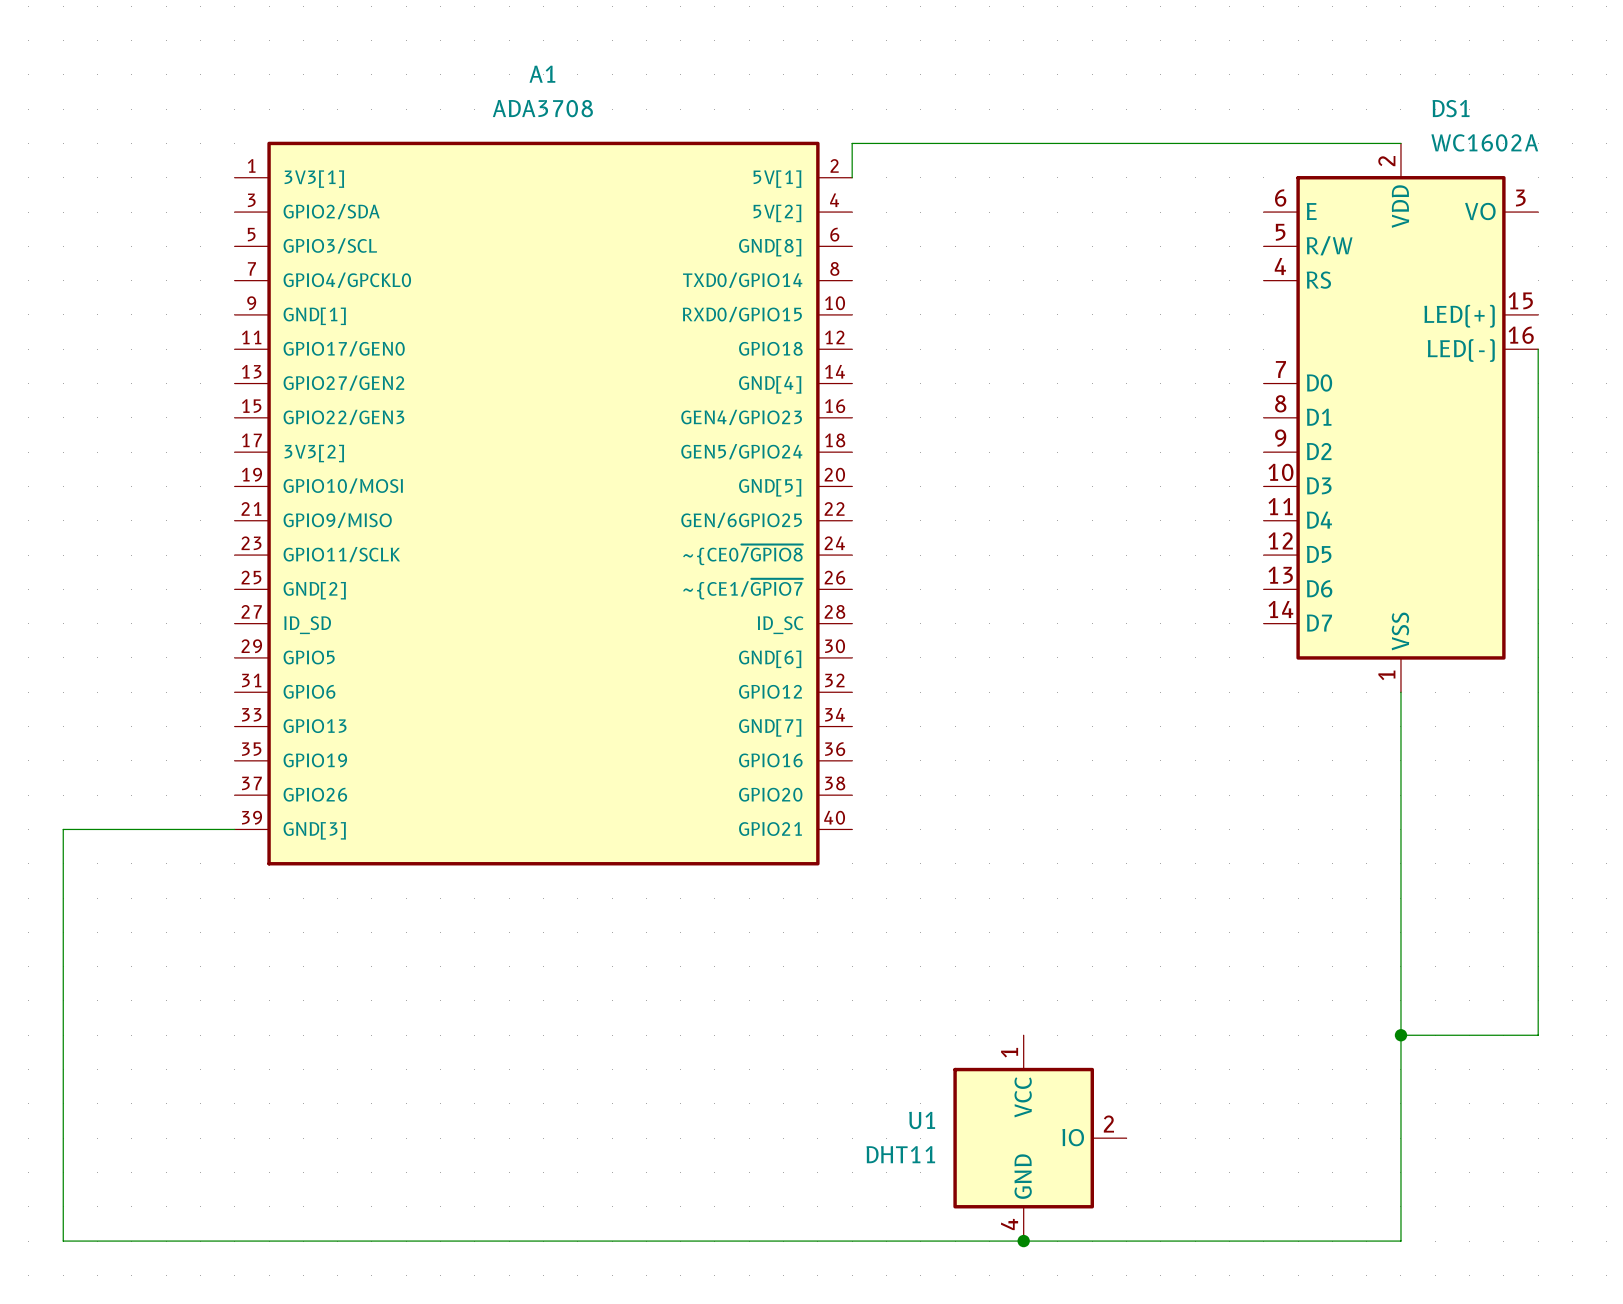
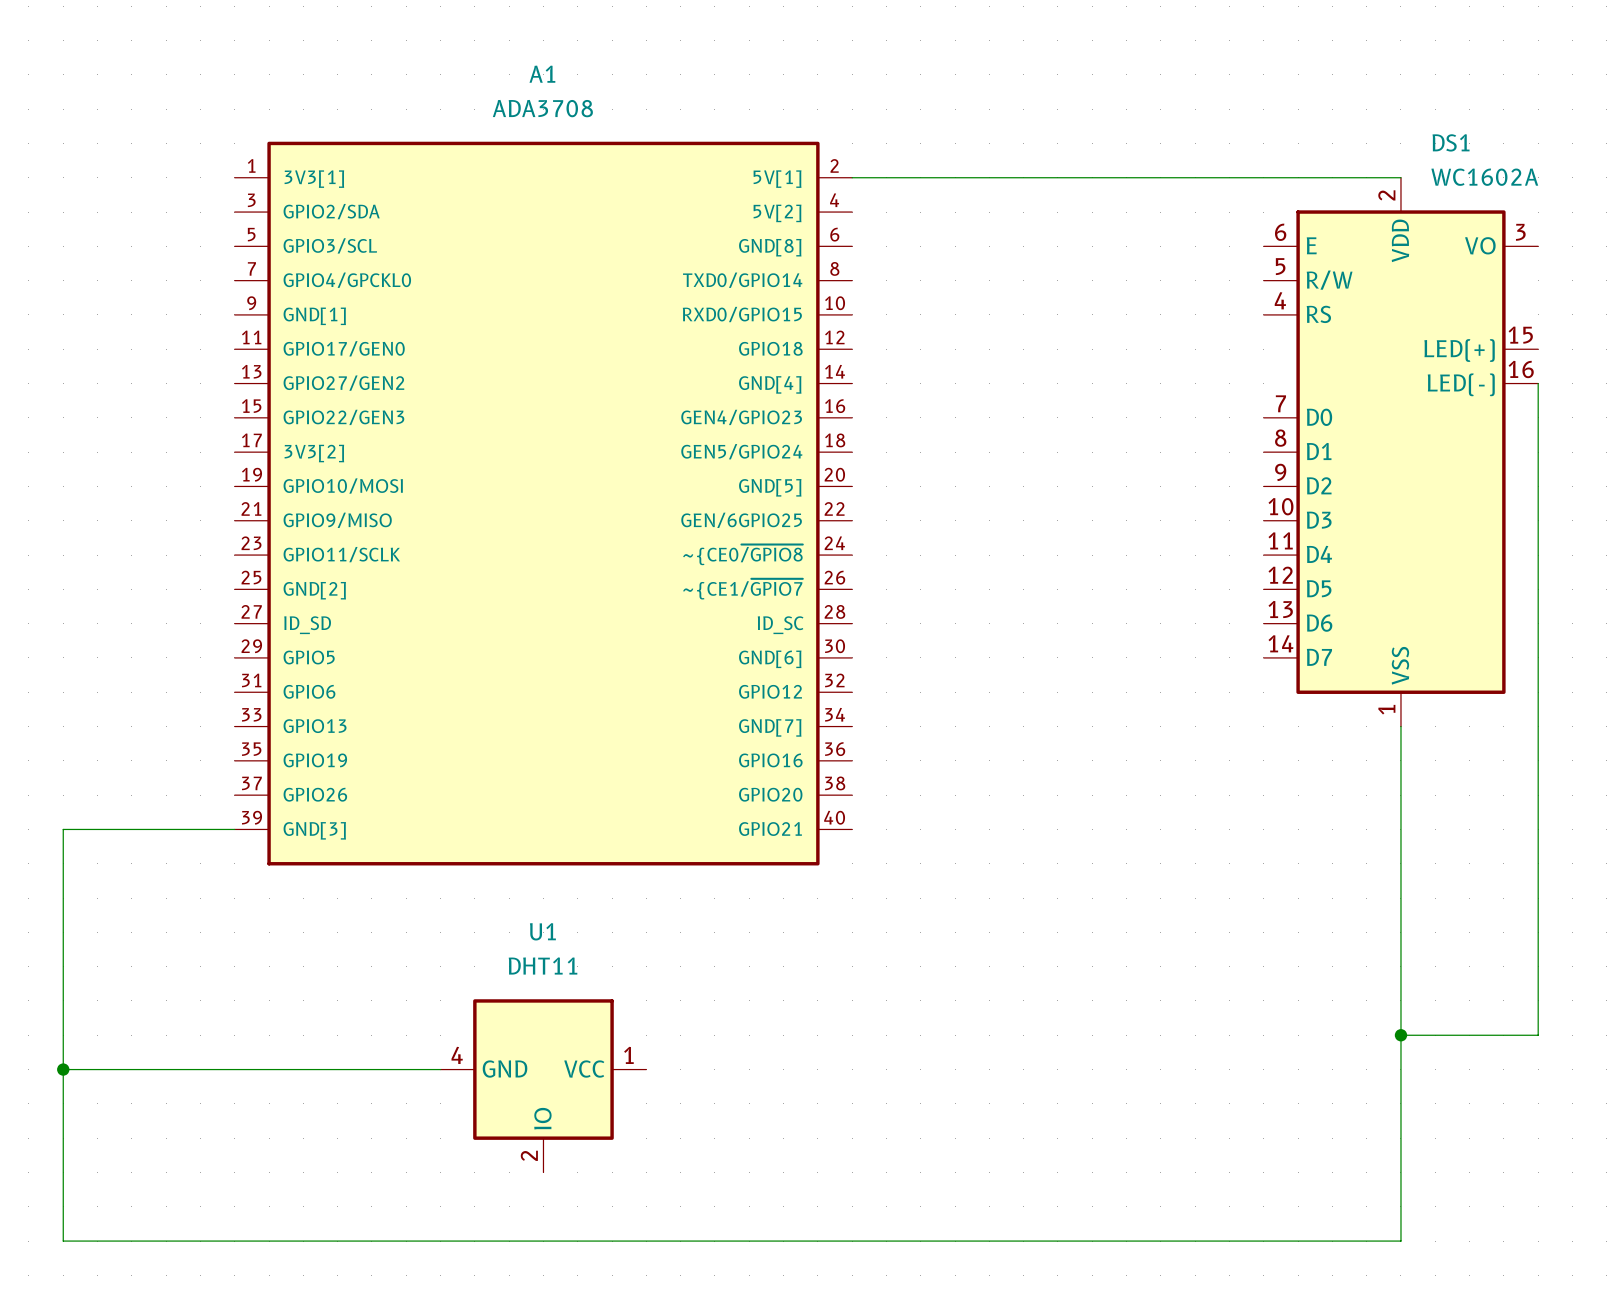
wire: (1400, 143) (852, 143) (852, 177) -> (1400, 177) (852, 177)
wire: (1538, 349) (1538, 383) -> none
DS1 position: (1400, 417) -> (1400, 452)
wire: none -> (63, 1069) (440, 1069)
junction: none -> (63, 1069)
U1 name position: U1 (922, 1120) -> U1 (542, 931)
U1 rotation: 0° (1023, 1138) -> 90° clockwise (543, 1069)
U1 position: (1039, 1138) -> (543, 1085)
U1 value position: DHT11 (900, 1154) -> DHT11 (543, 966)
junction: (1023, 1241) -> none

